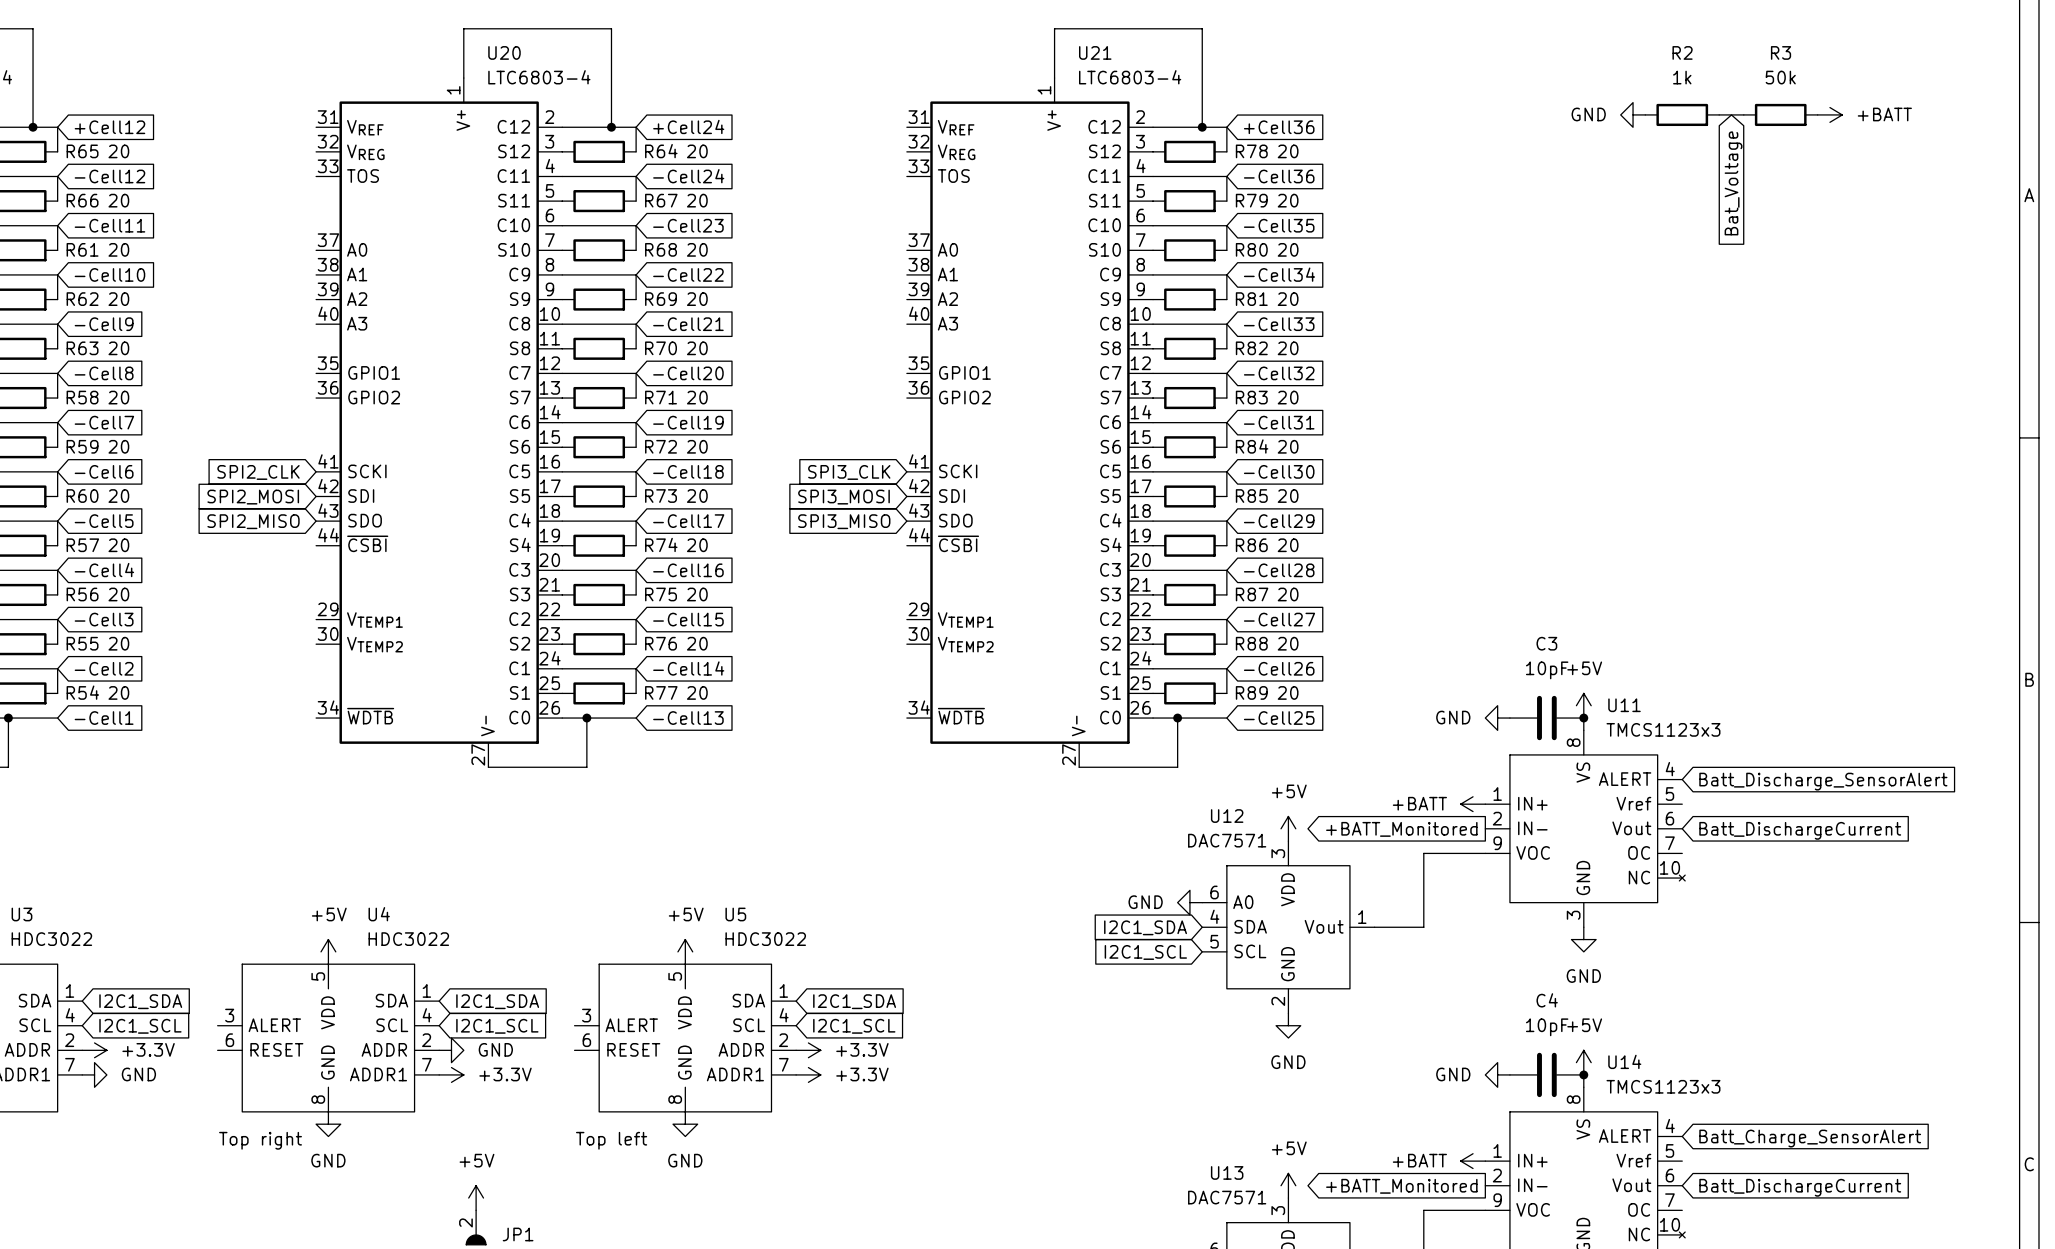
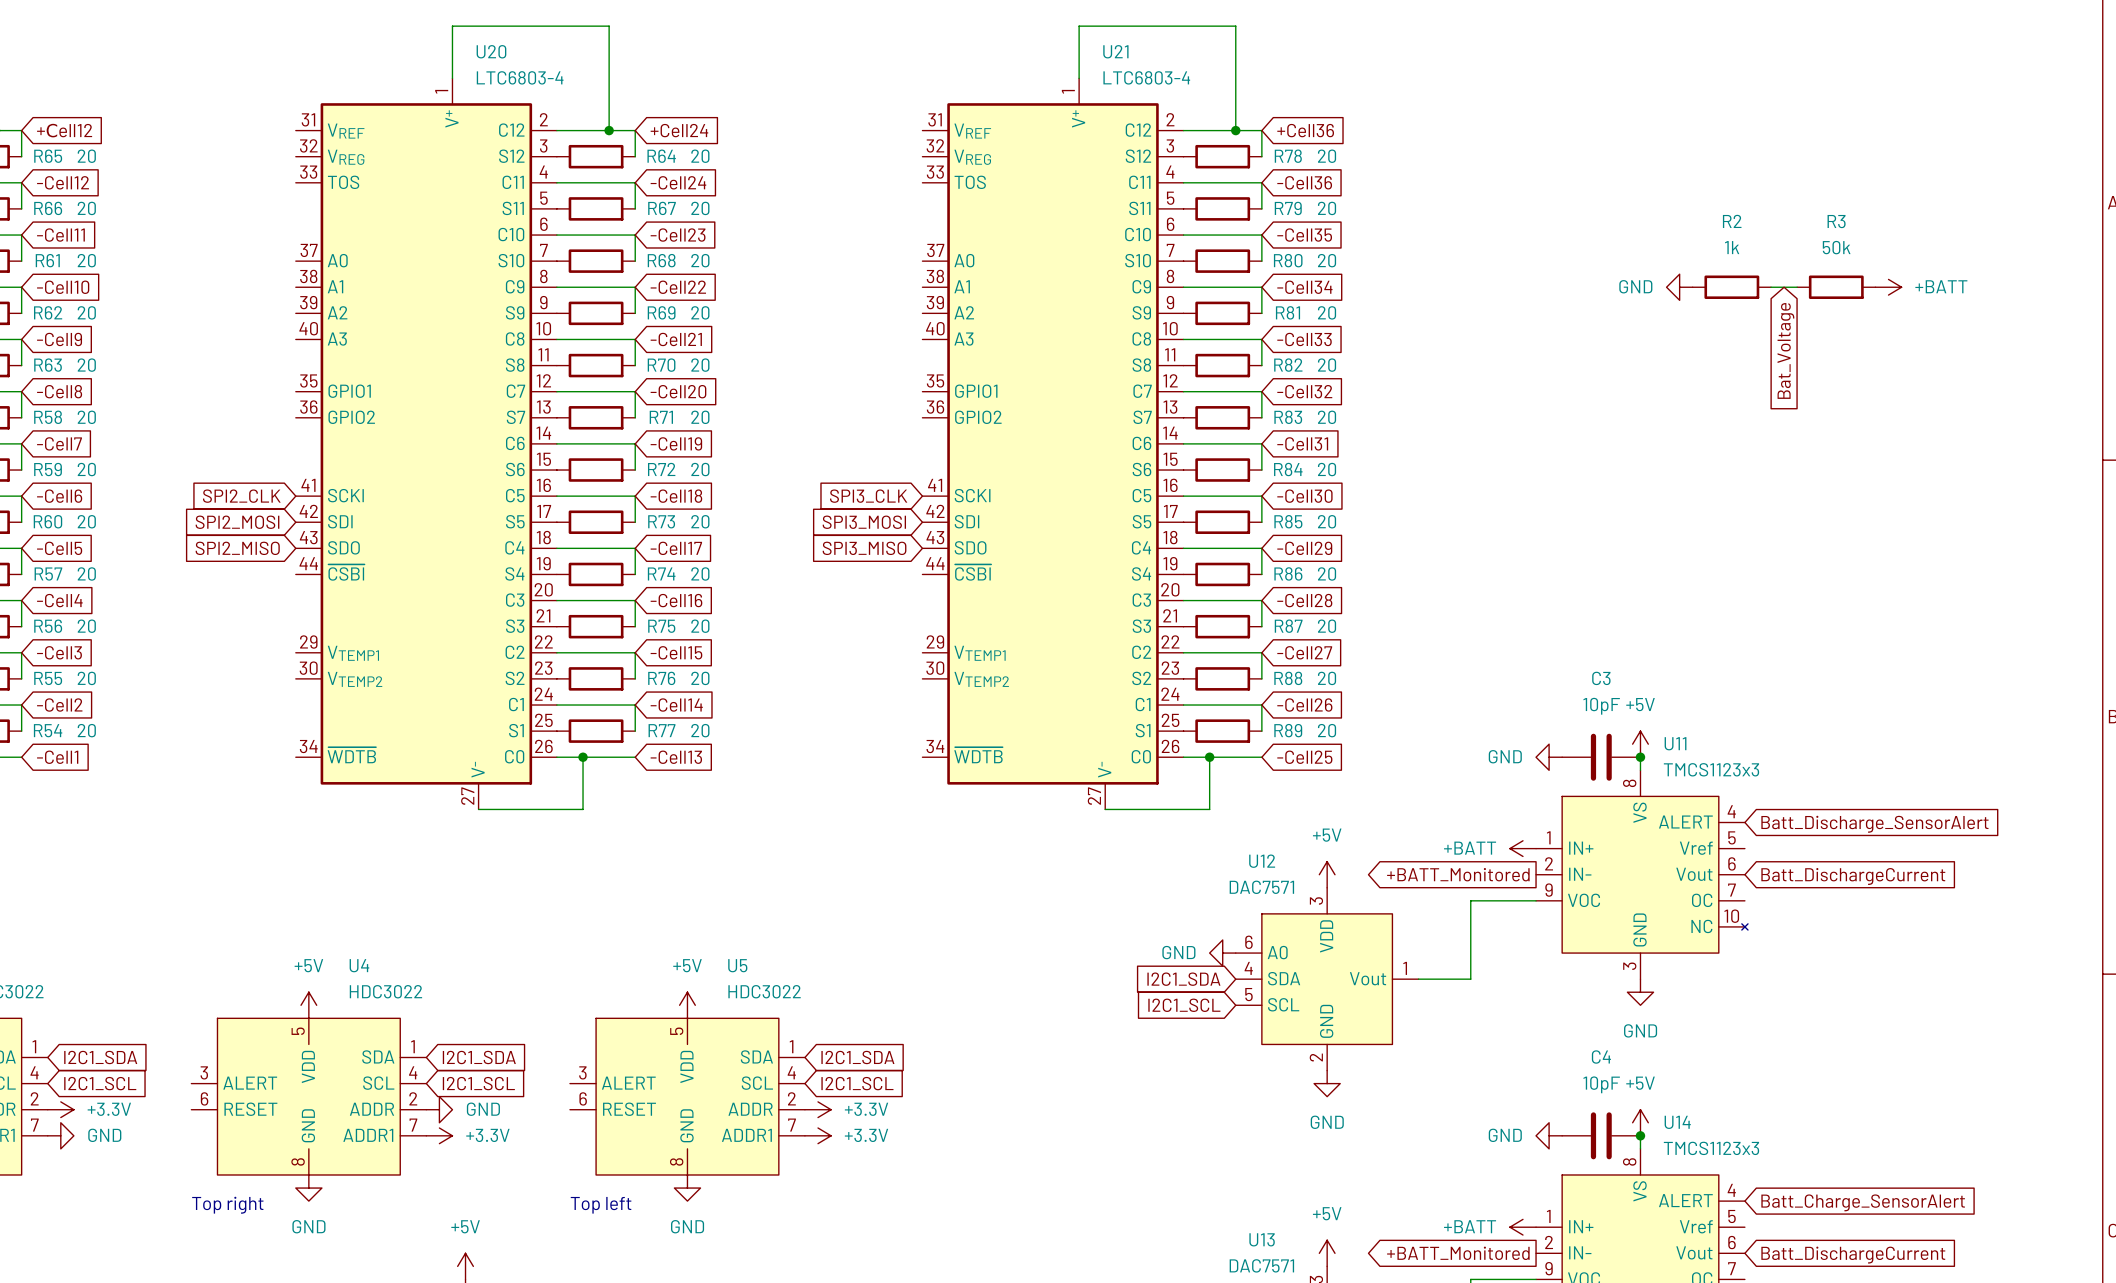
power symbol position: GND (1633, 114) -> GND (1679, 287)
R2 position: (1682, 114) -> (1731, 287)
wire: (1719, 114) (1743, 114) -> (1771, 287) (1797, 287)
R3 position: (1780, 114) -> (1836, 287)
power symbol position: +BATT (1829, 114) -> +BATT (1888, 287)
global label position: Bat_Voltage (1733, 183) -> Bat_Voltage (1785, 350)

